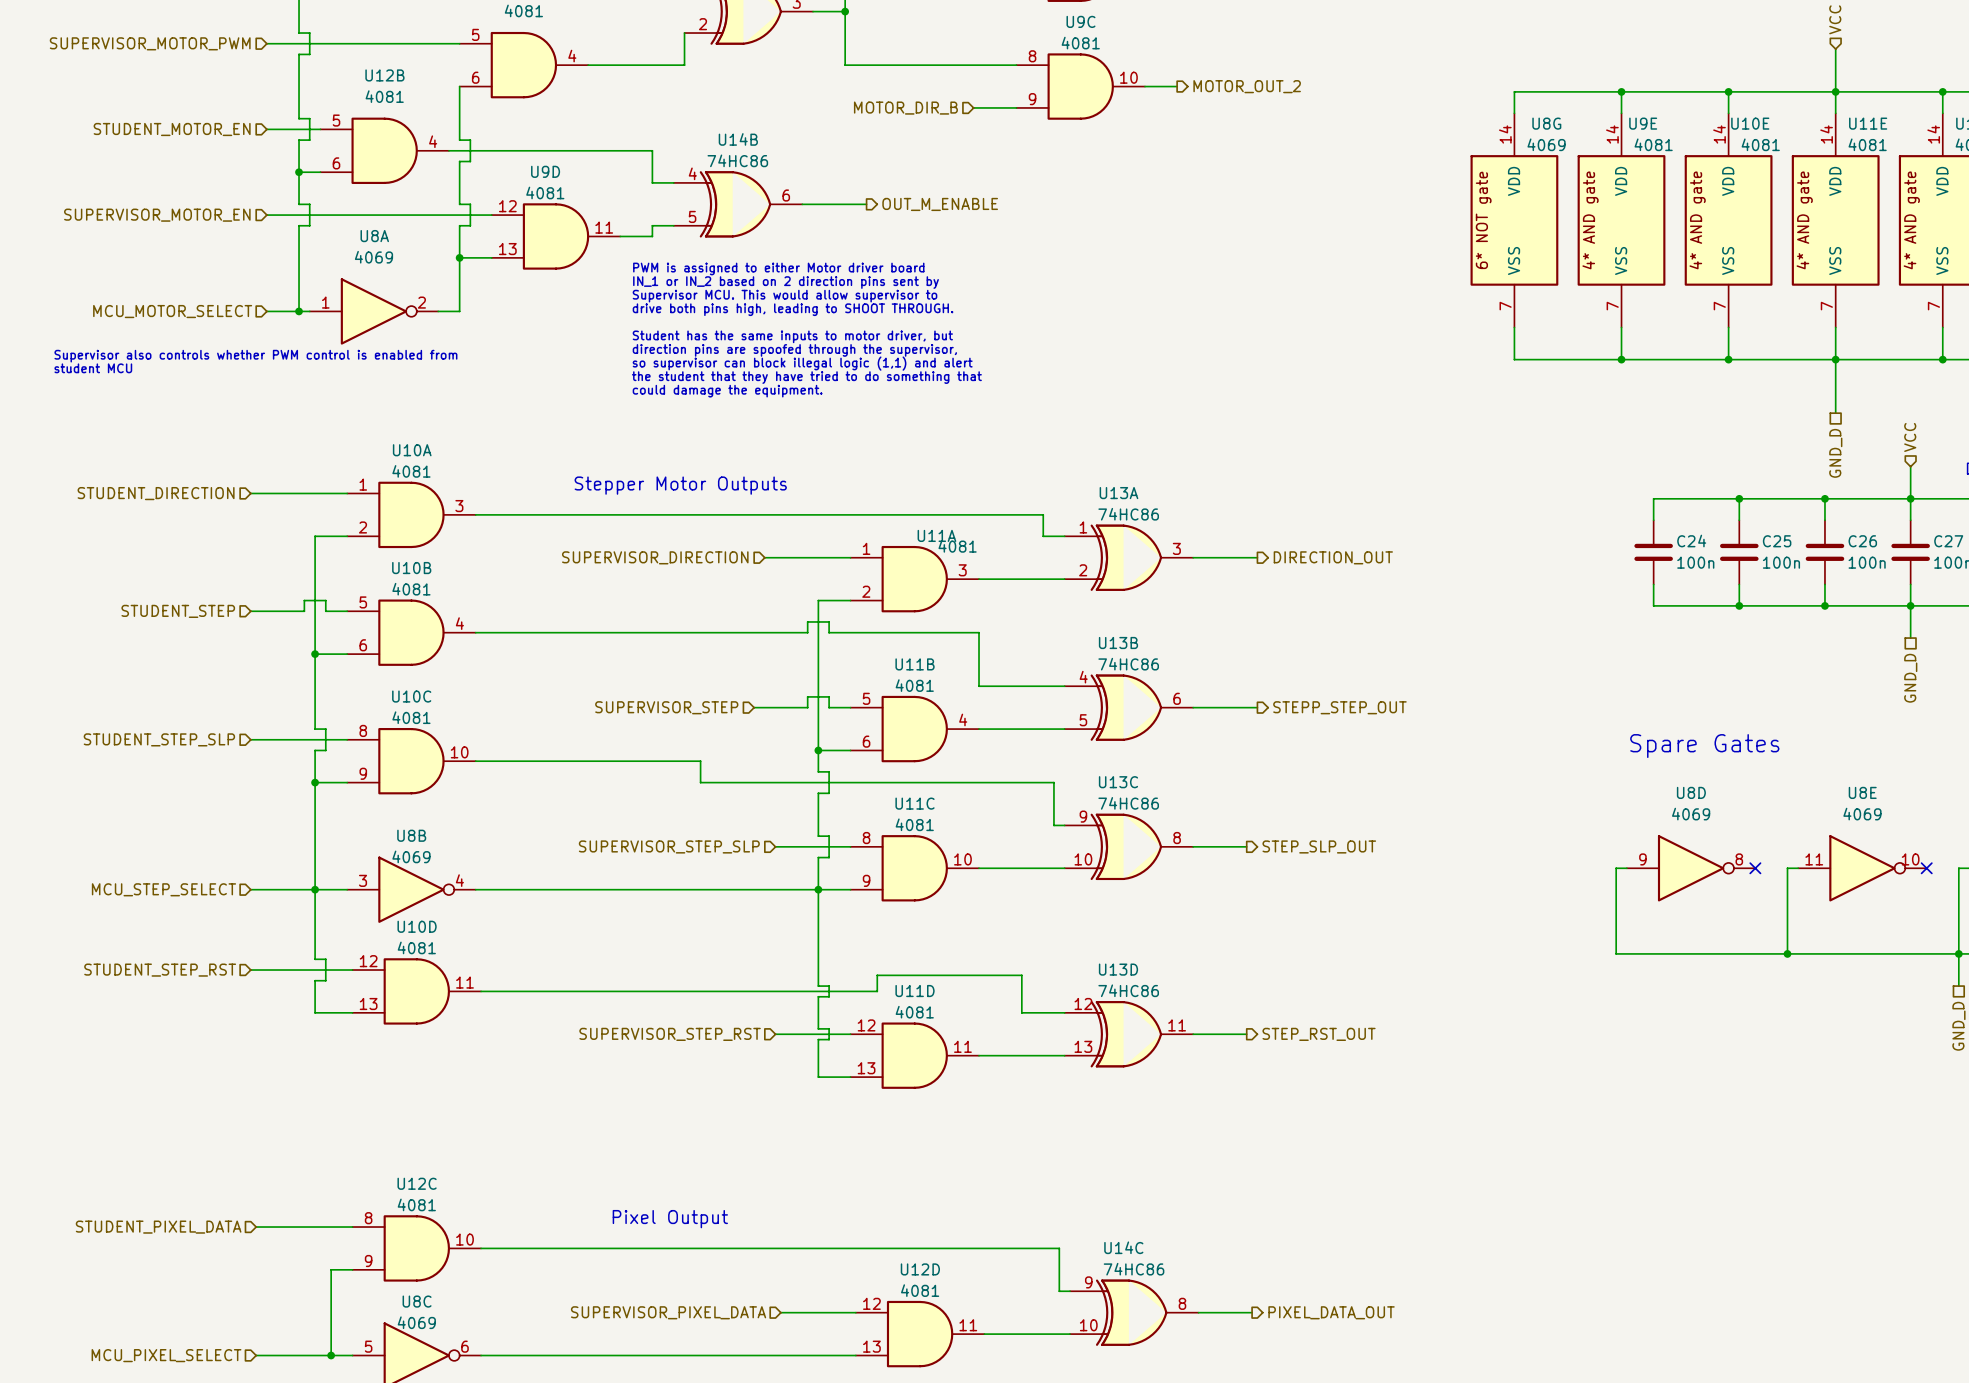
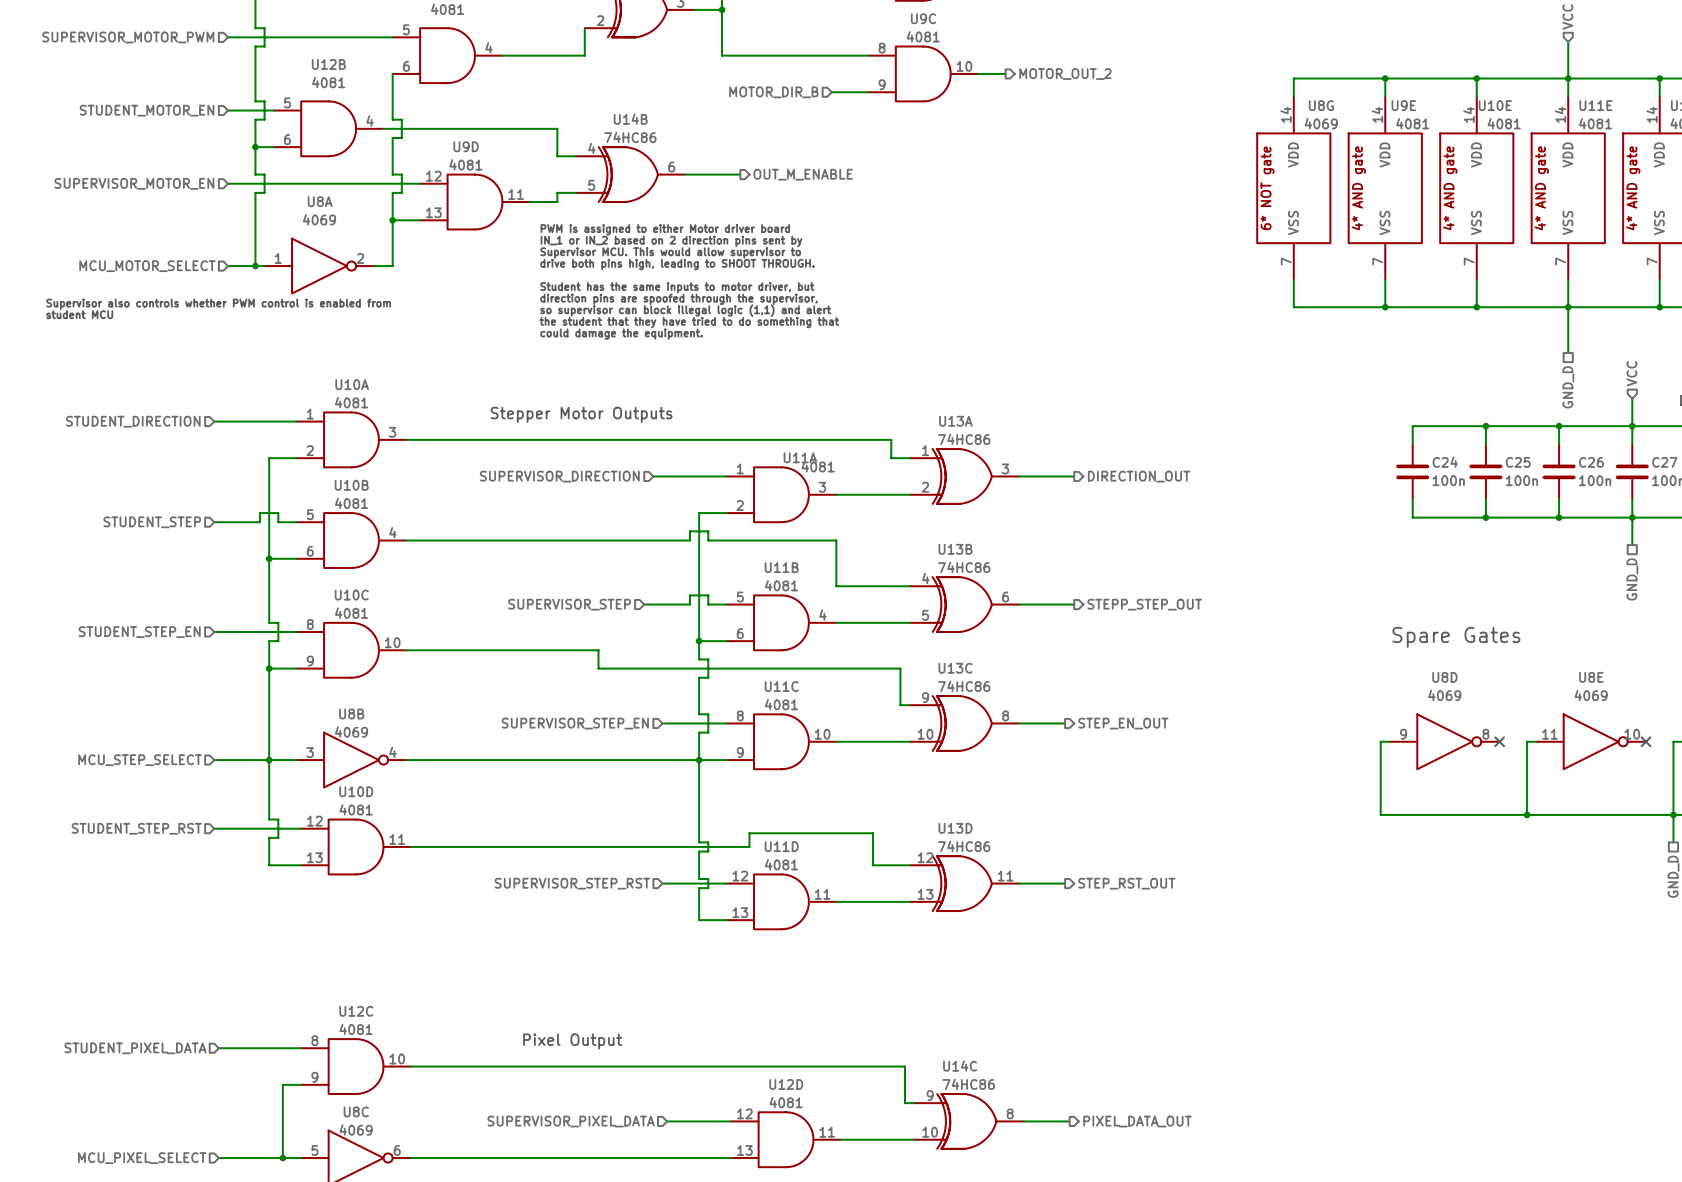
hierarchical label: STUDENT_STEP_SLP (159, 739) -> STUDENT_STEP_EN (139, 632)
hierarchical label: SUPERVISOR_STEP_SLP (669, 846) -> SUPERVISOR_STEP_EN (575, 723)
hierarchical label: STEP_SLP_OUT (1319, 846) -> STEP_EN_OUT (1123, 723)

